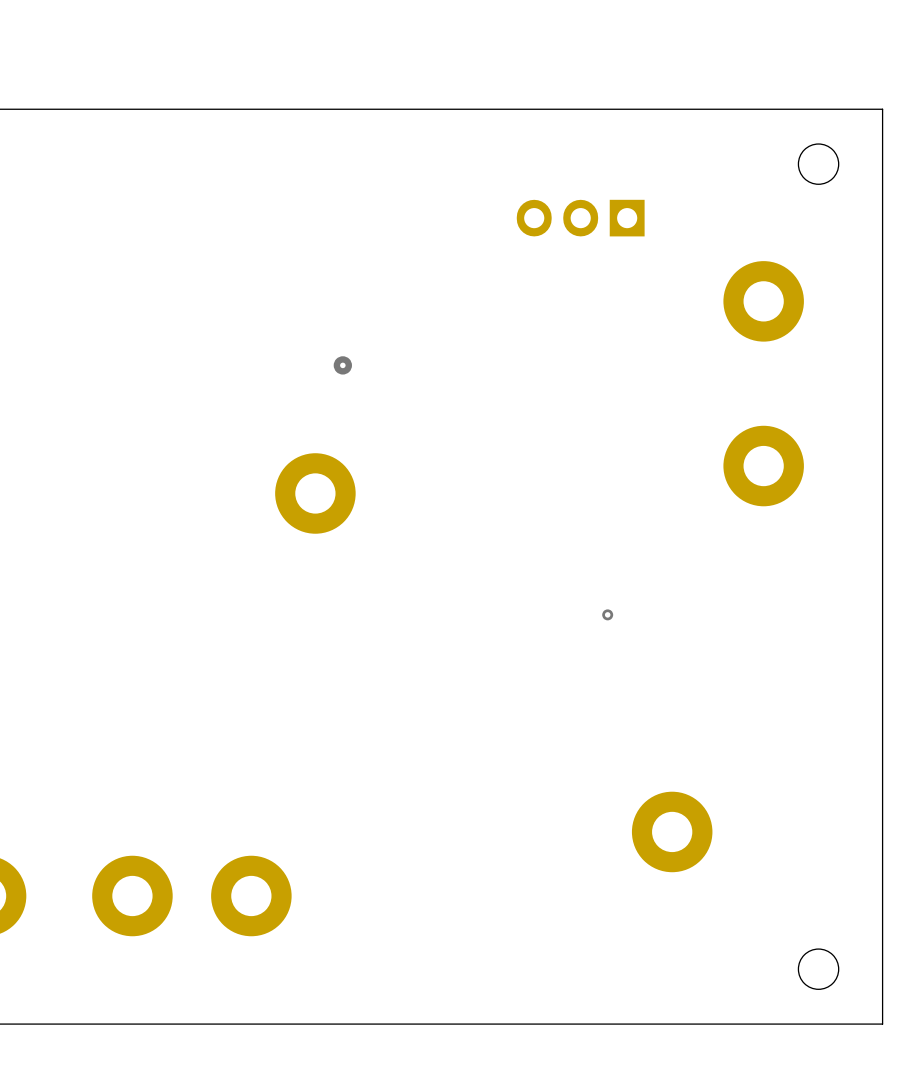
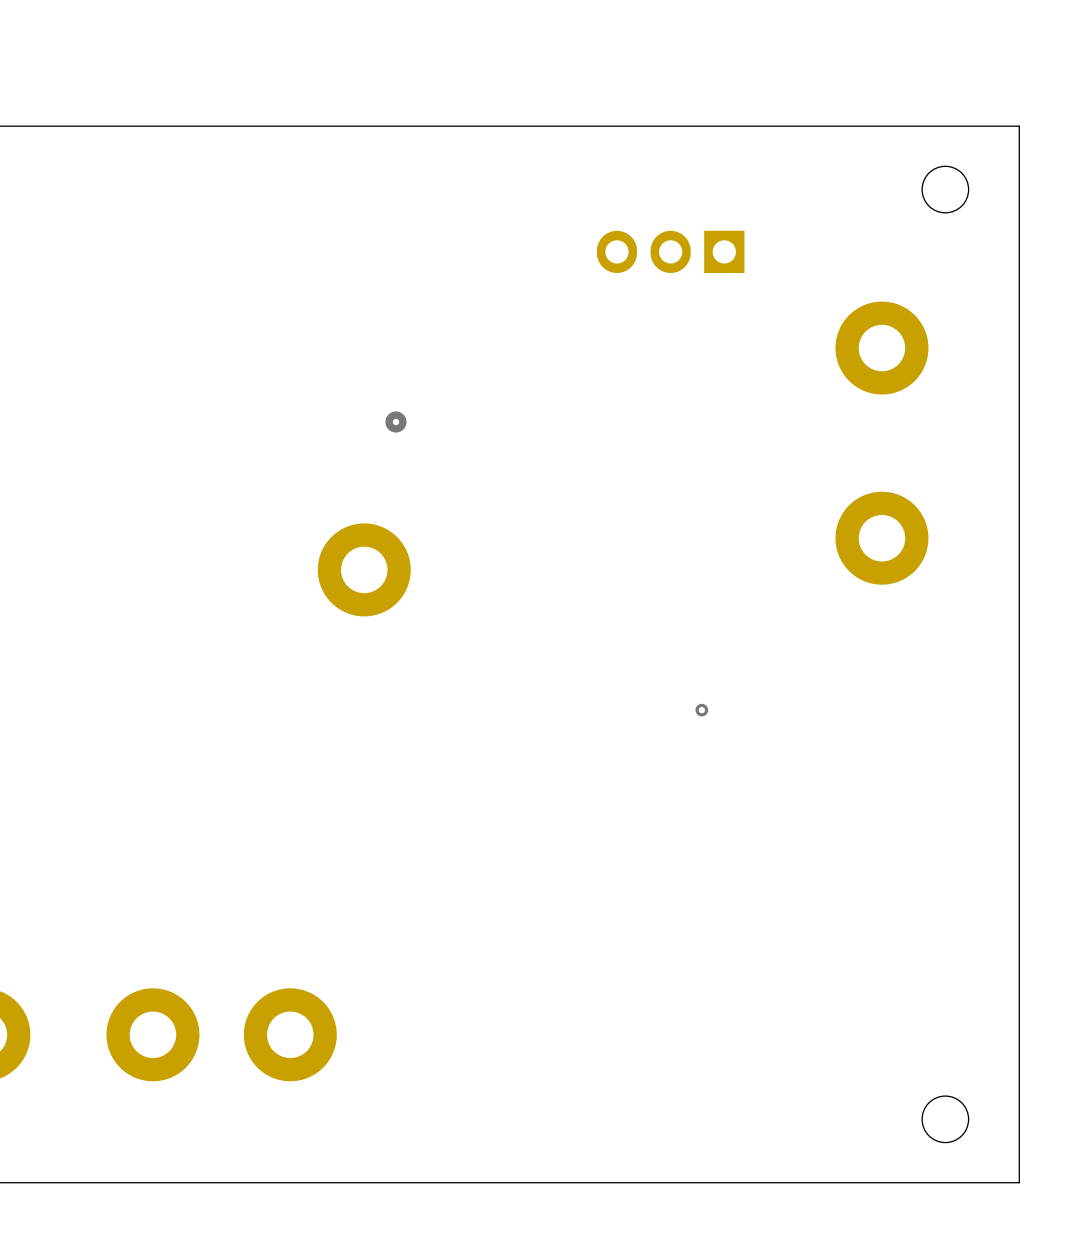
part: (672, 831) -> none

